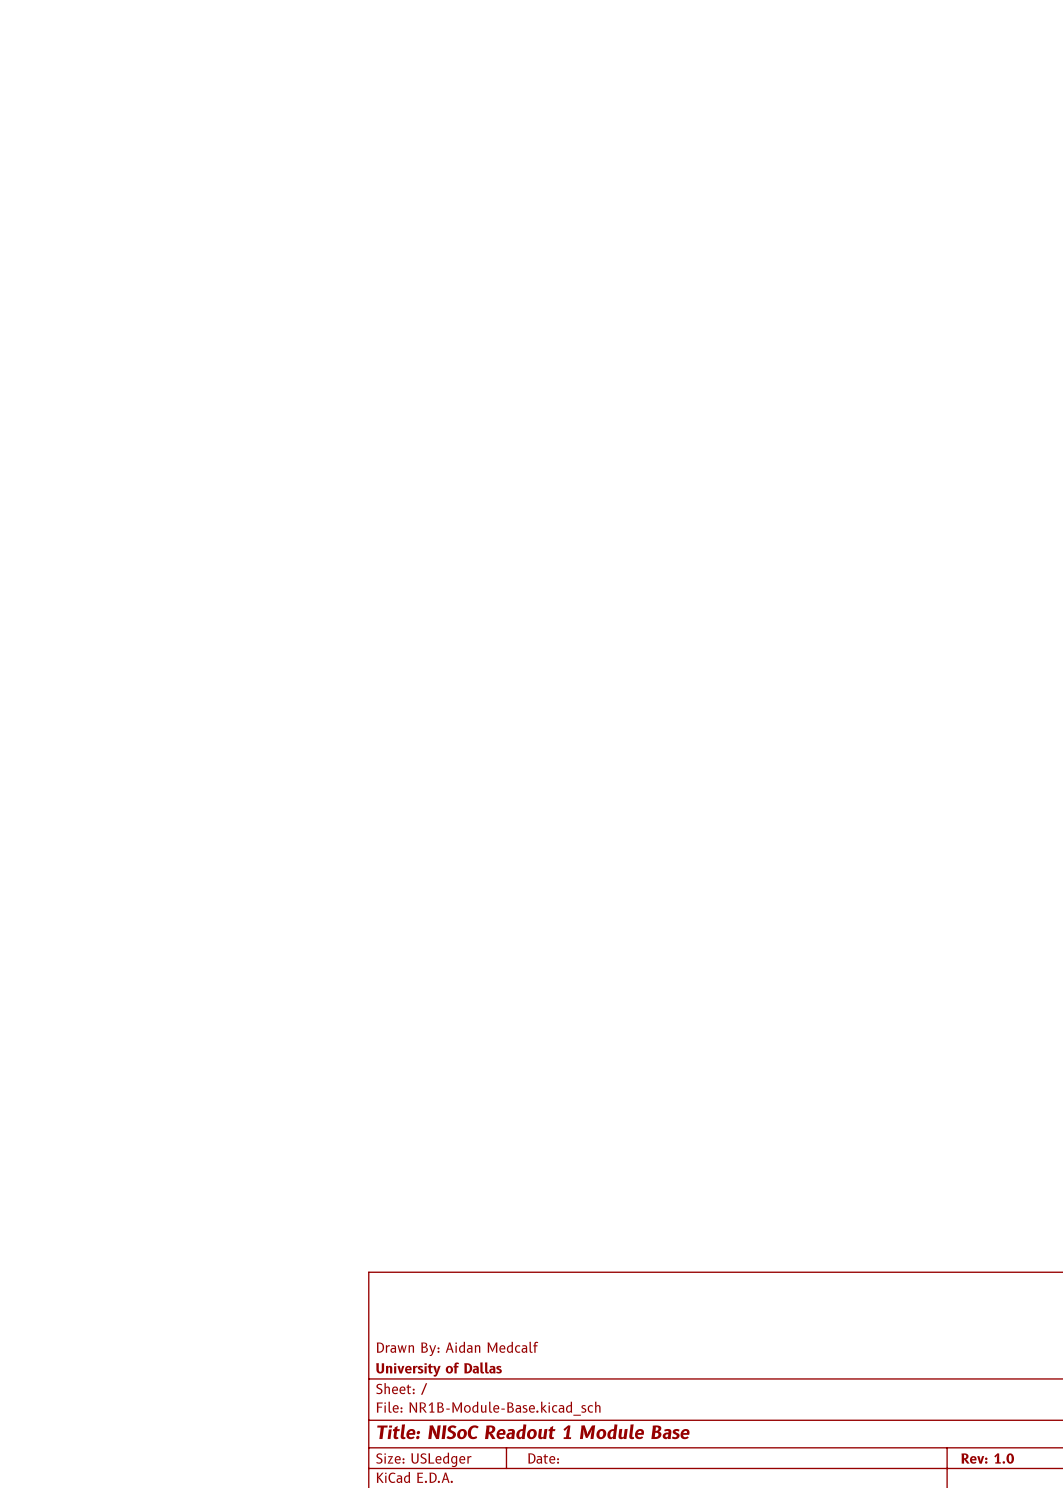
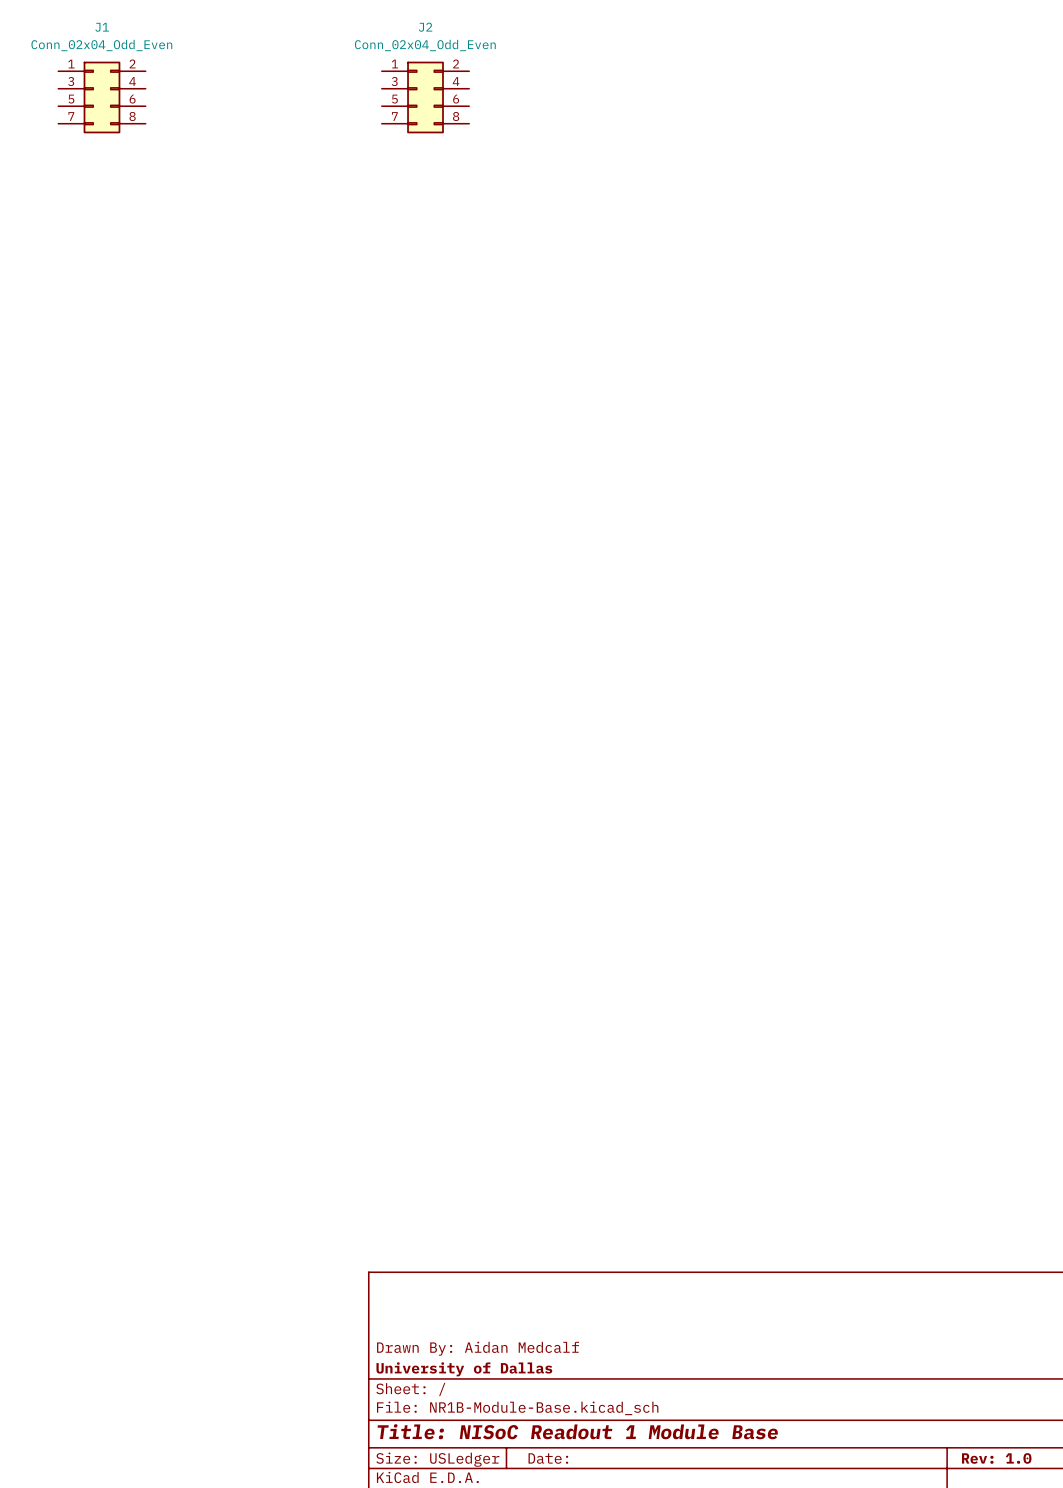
J1: none -> Conn_02x04_Odd_Even (101, 97)
J2: none -> Conn_02x04_Odd_Even (425, 97)

